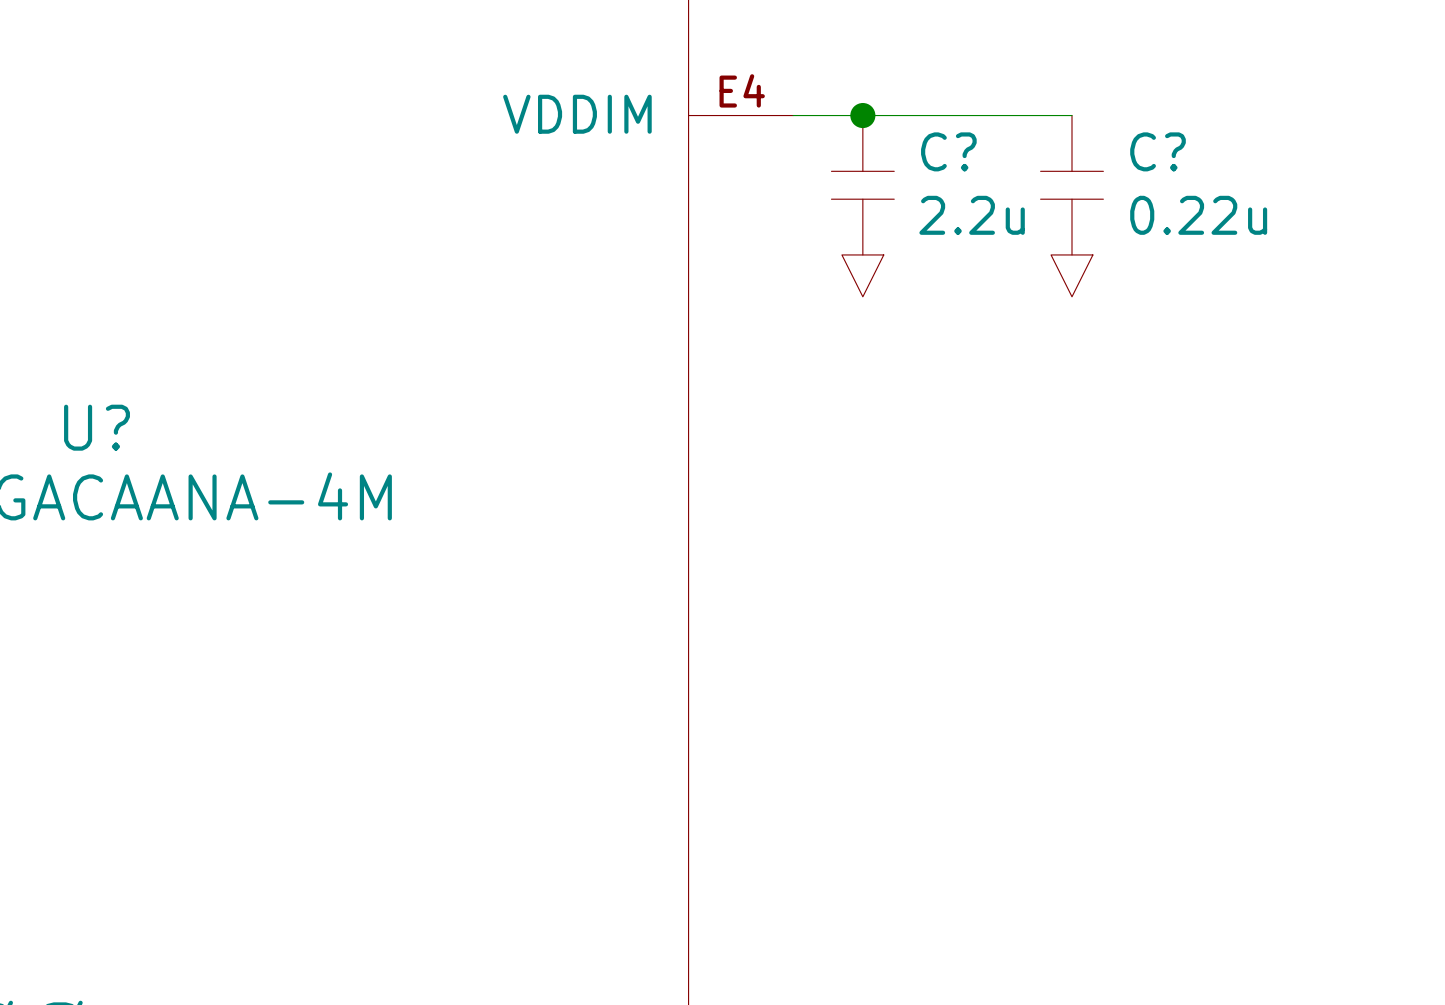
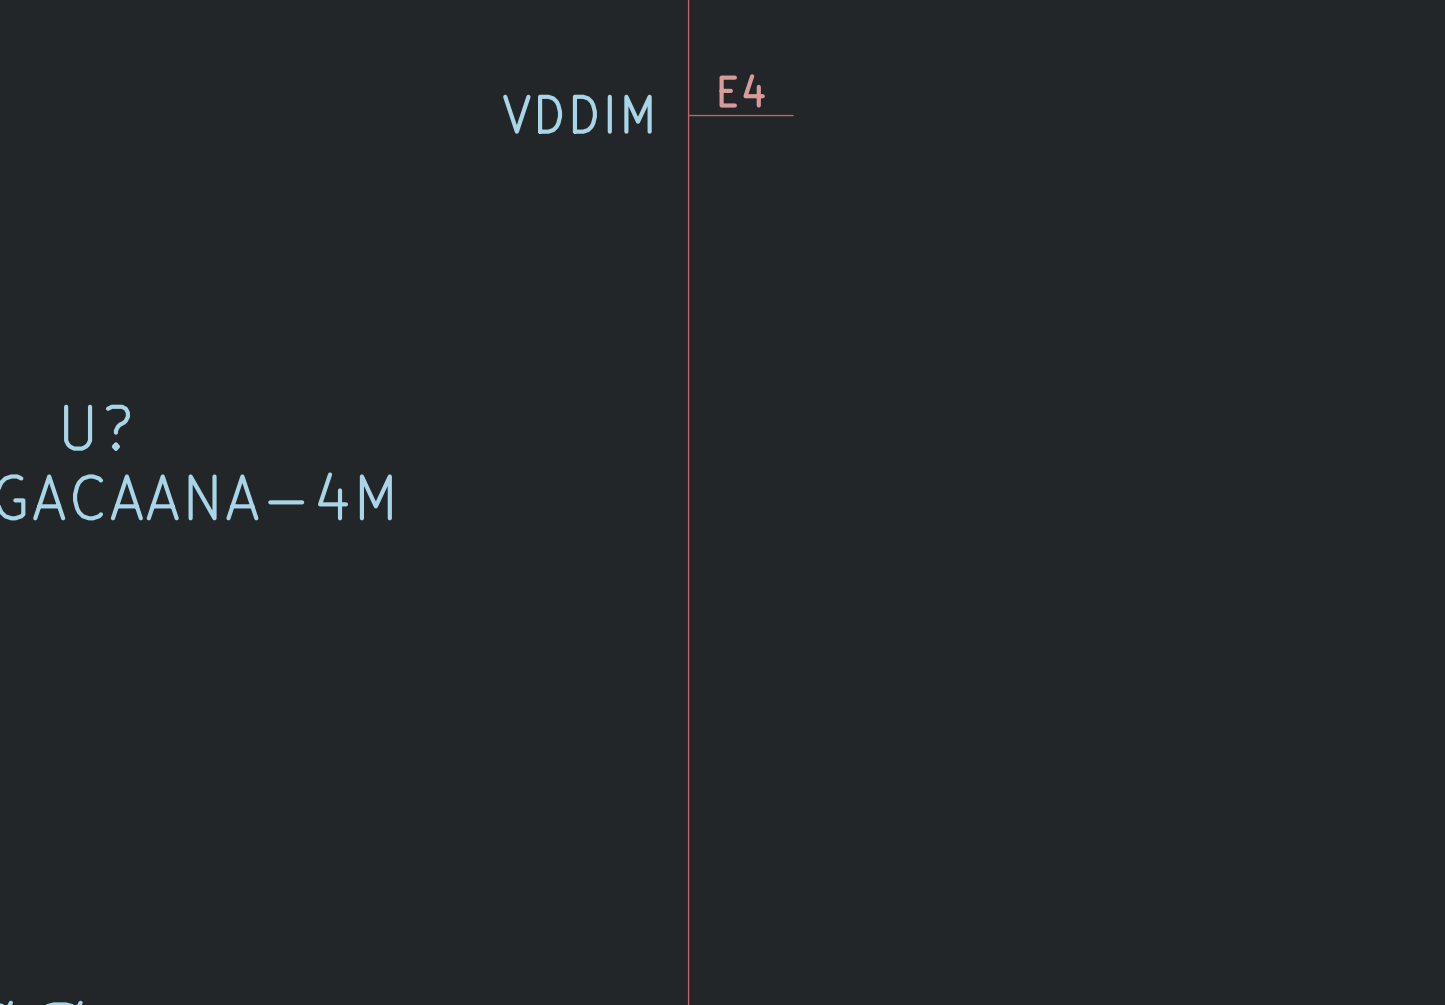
wire: (793, 115) (1071, 115) -> none
junction: (862, 115) -> none
C?: 2.2u (862, 185) -> none
C?: 0.22u (1071, 185) -> none
power symbol: (862, 275) -> none
power symbol: (1071, 275) -> none

